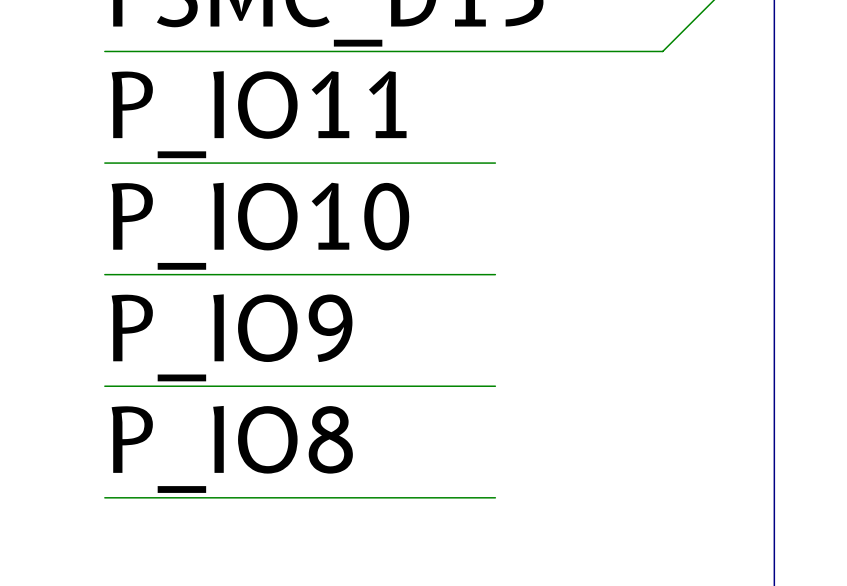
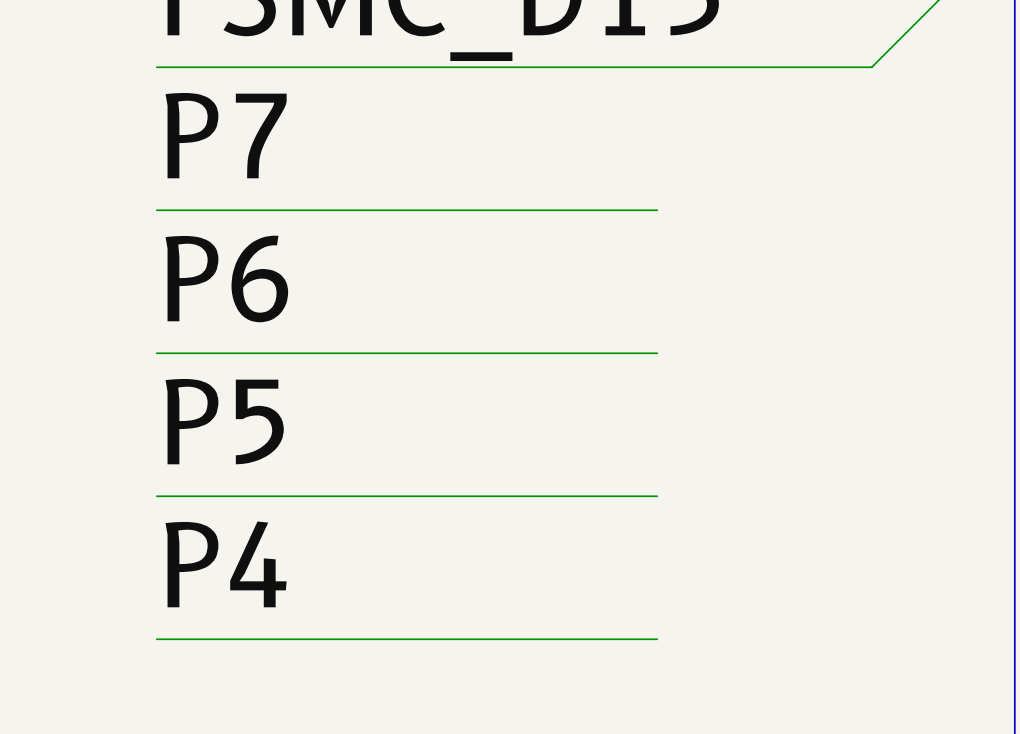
label: P_IO11 (259, 114) -> P7 (226, 135)
label: P_IO10 (260, 226) -> P6 (226, 278)
label: P_IO9 (232, 337) -> P5 (224, 421)
label: P_IO8 (232, 449) -> P4 (226, 564)

